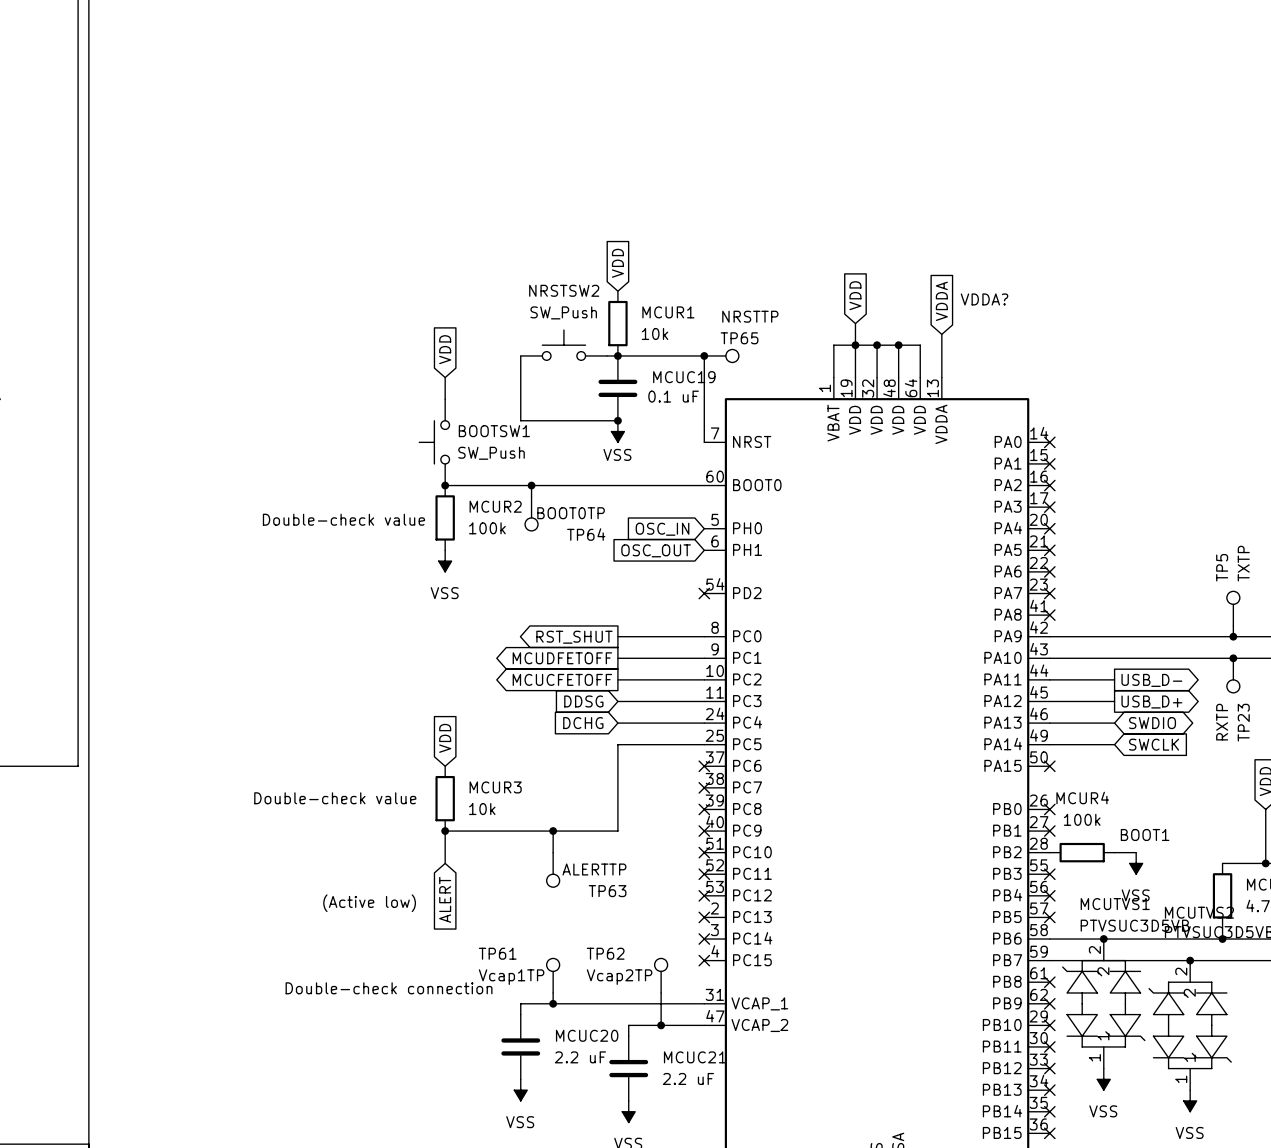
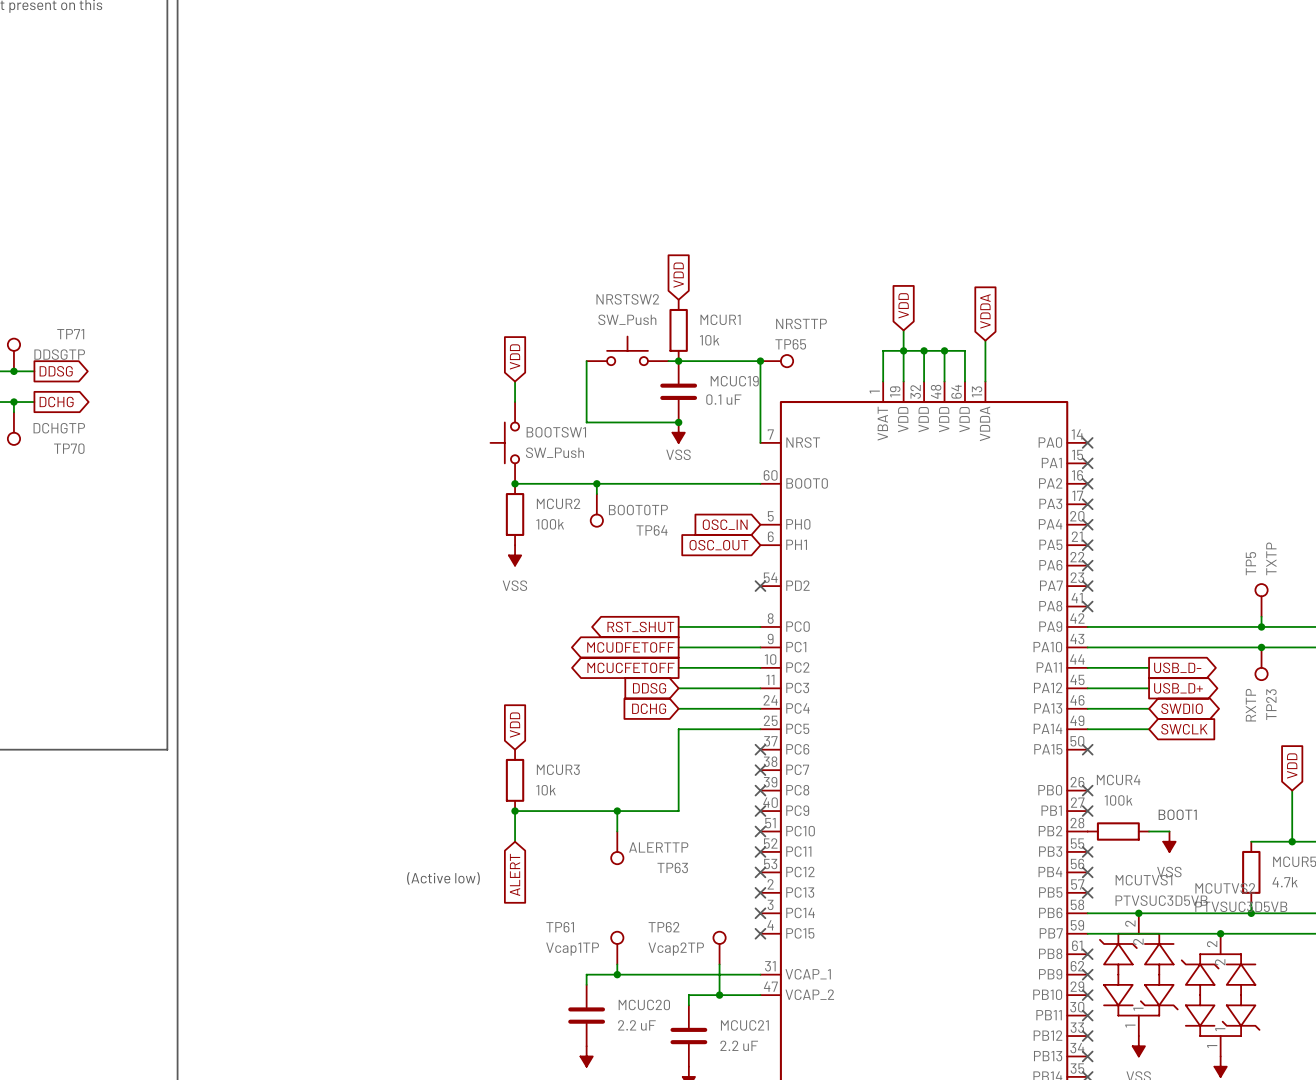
text: VDDA? (984, 299) -> none
text: Double-check value (343, 519) -> none
text: Double-check value (335, 798) -> none
text: Double-check connection (389, 988) -> none

